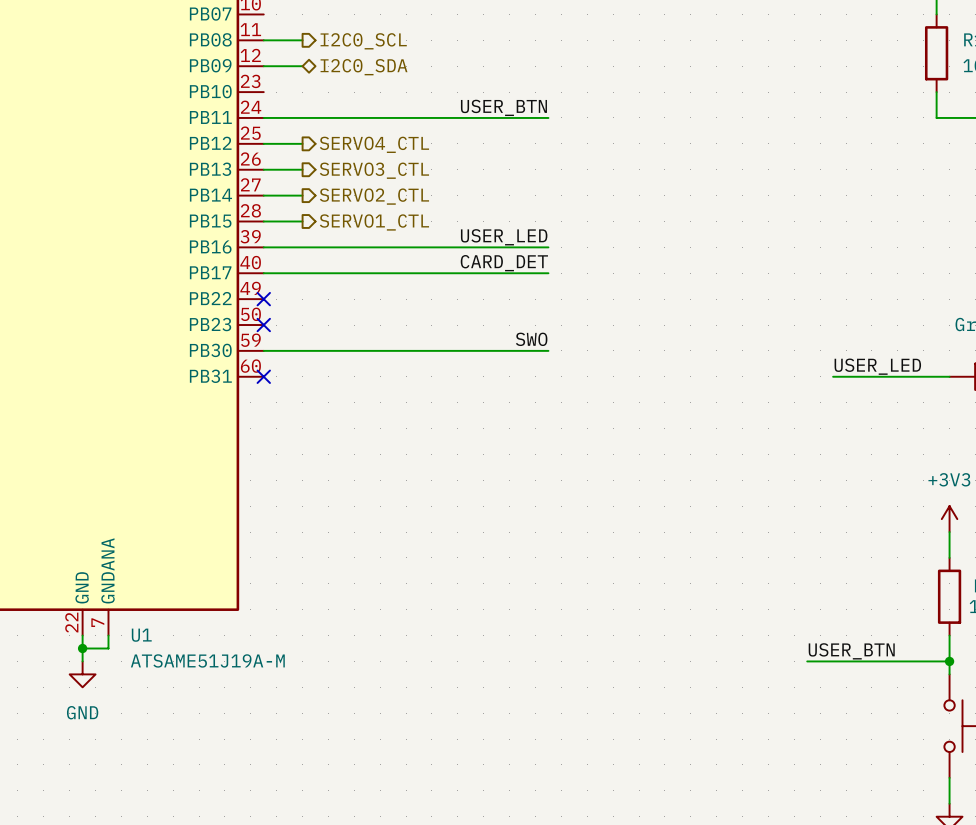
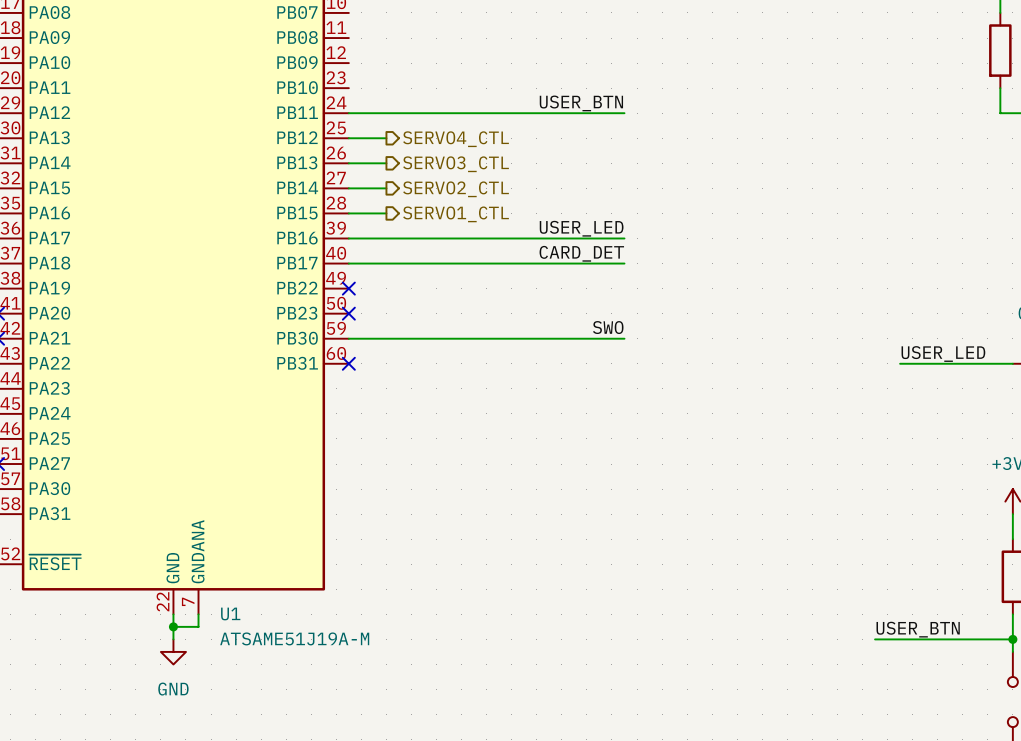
wire: (263, 40) (302, 40) -> none
hierarchical label: I2C0_SCL (363, 41) -> none
wire: (263, 66) (302, 66) -> none
hierarchical label: I2C0_SDA (364, 67) -> none

